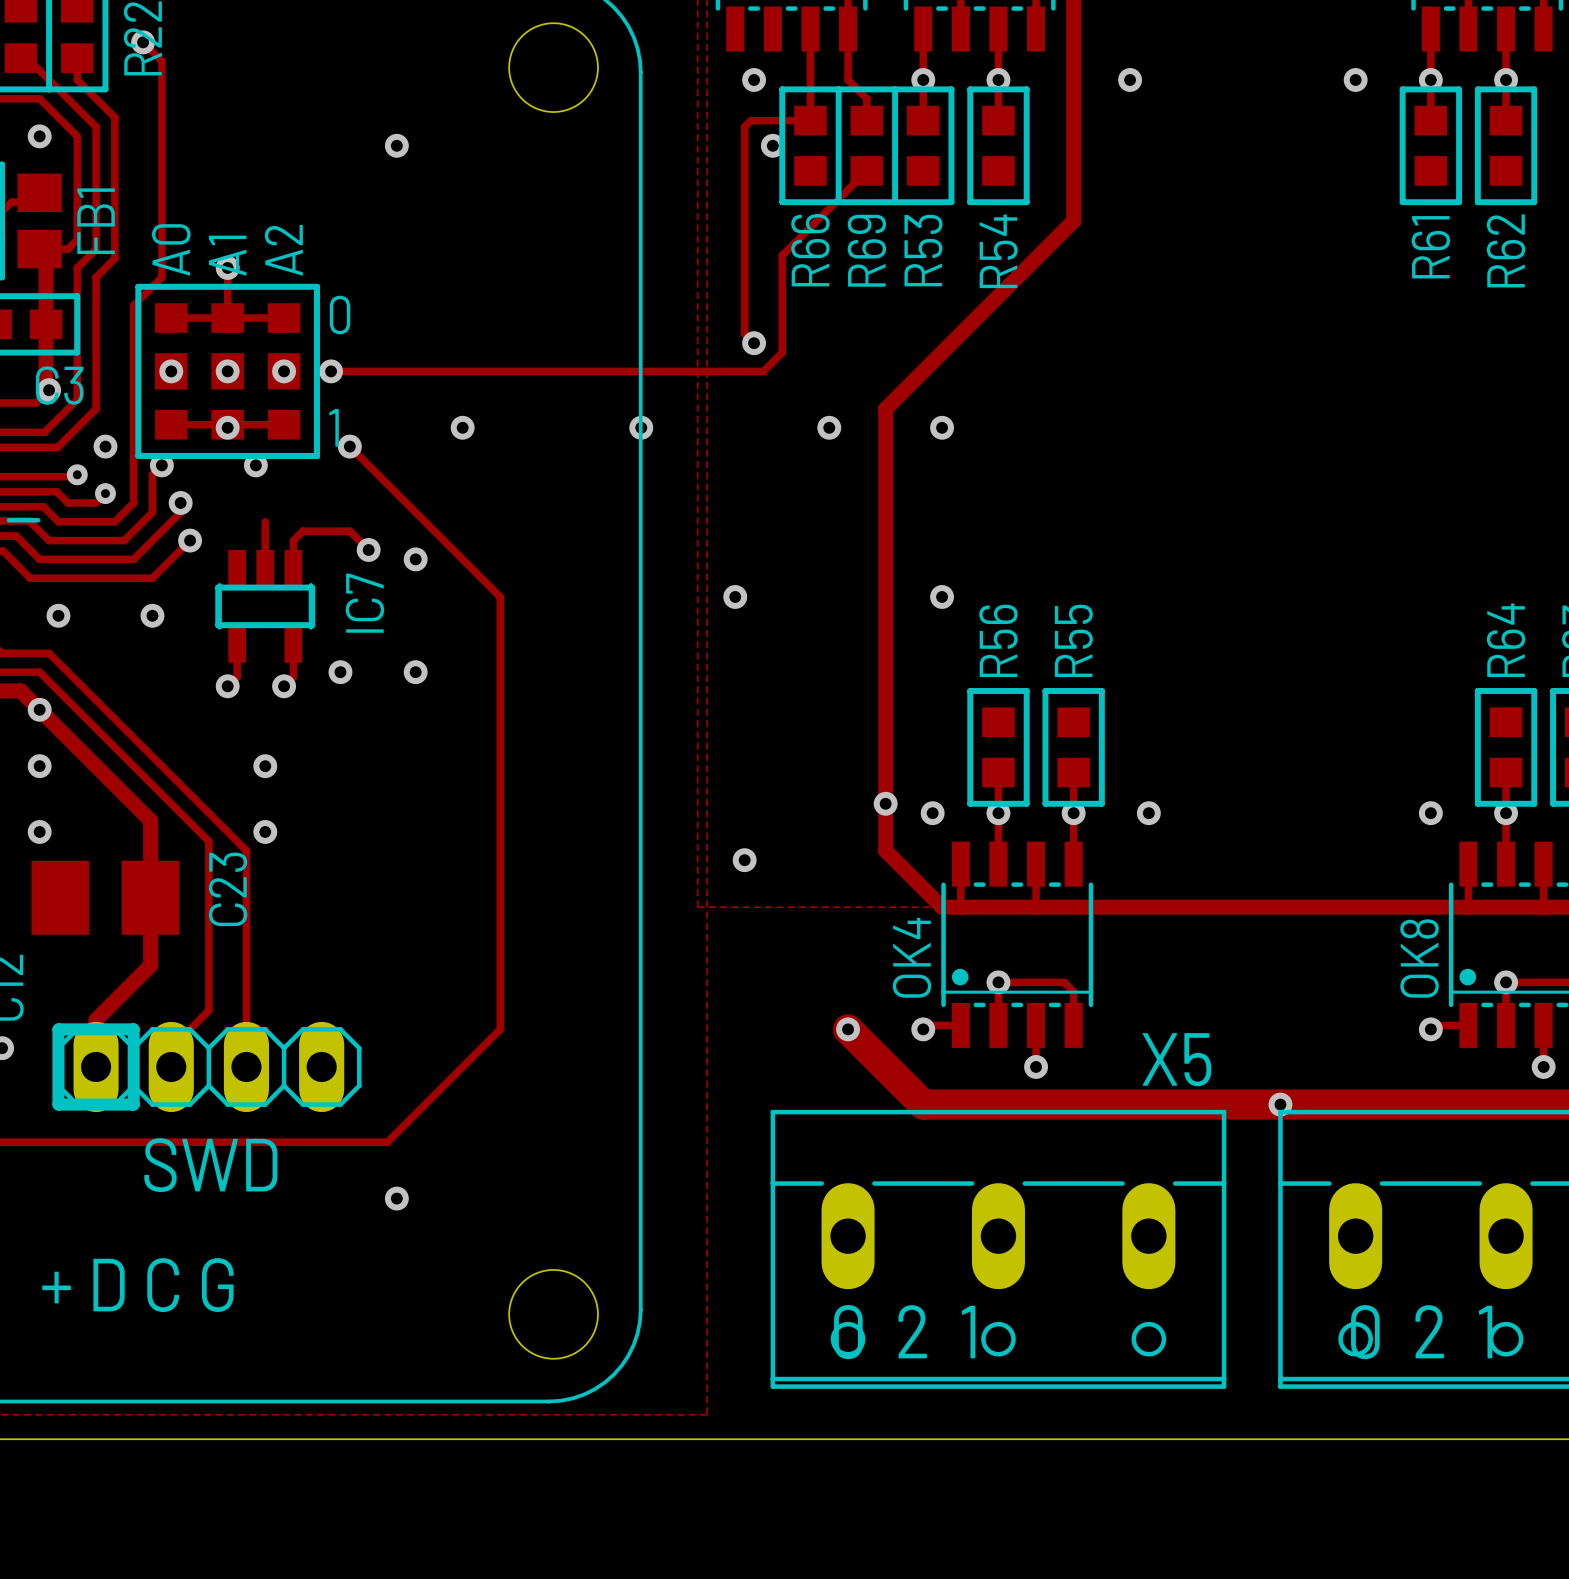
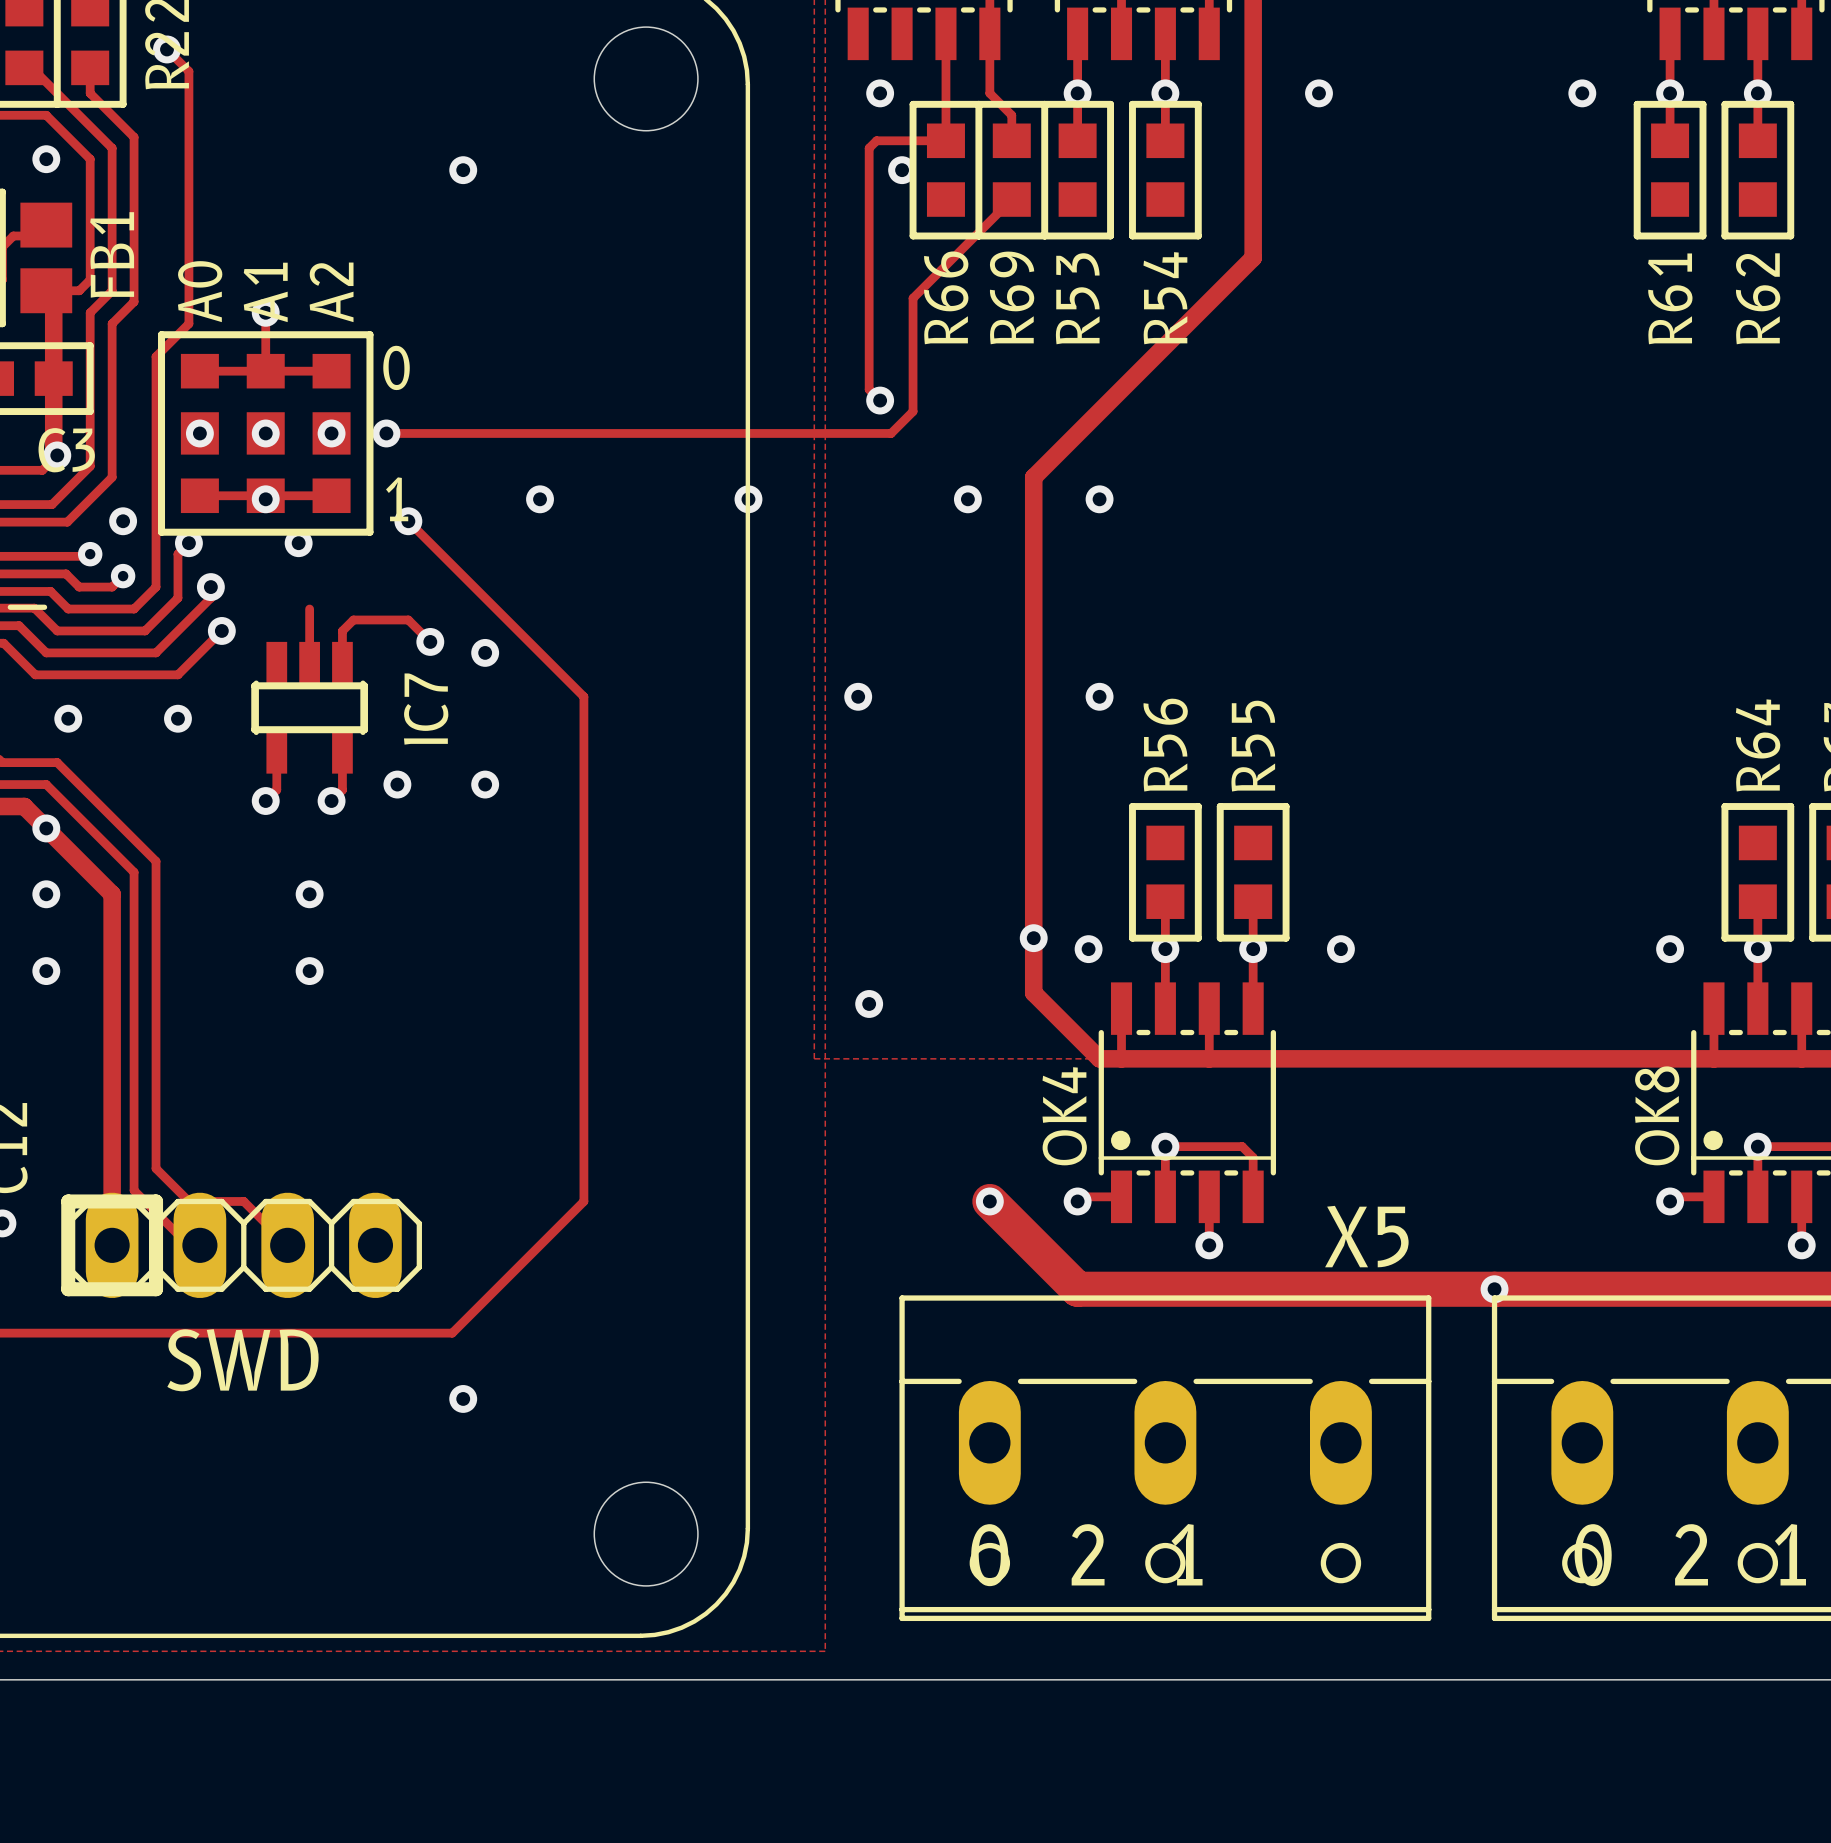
track: (133, 737) (246, 850) (246, 1066) -> (156, 861) (156, 1168) (188, 1201) (243, 1201) (287, 1245)
track: (114, 747) (208, 841) (208, 1010) (171, 1048) (171, 1066) -> (134, 872) (134, 1190) (188, 1245) (199, 1245)
track: (96, 766) (150, 820) (150, 965) (96, 1019) -> (112, 894) (112, 1190)
C23: (105, 897) -> none
text: + D C G (137, 1285) -> none

